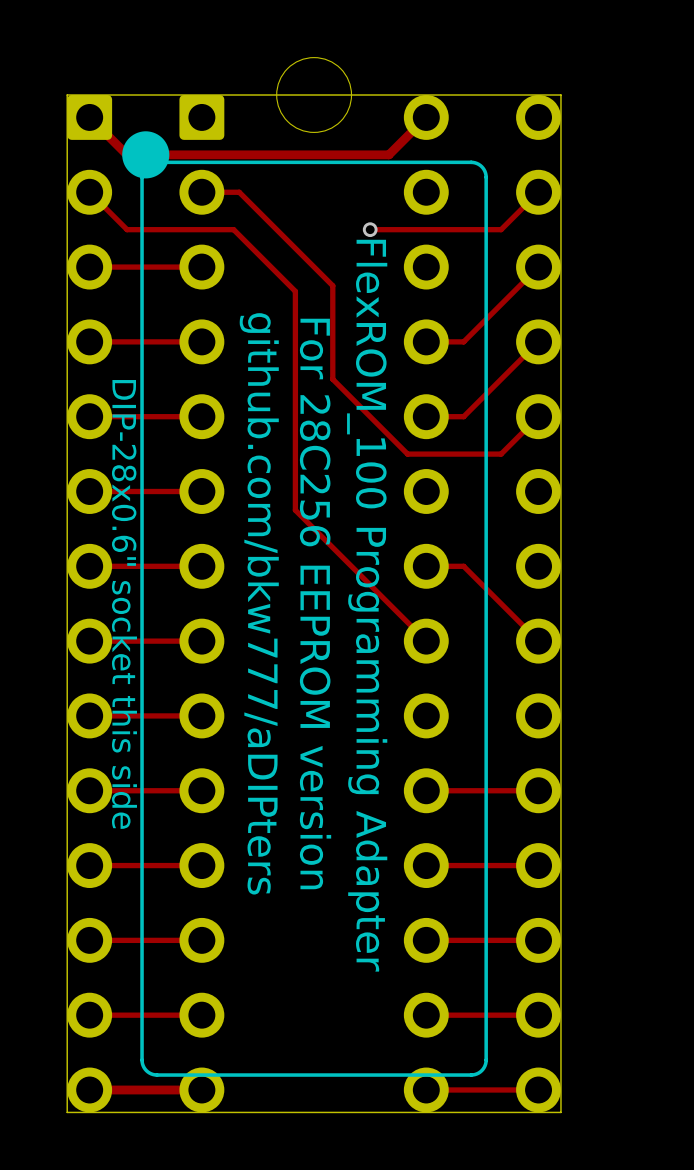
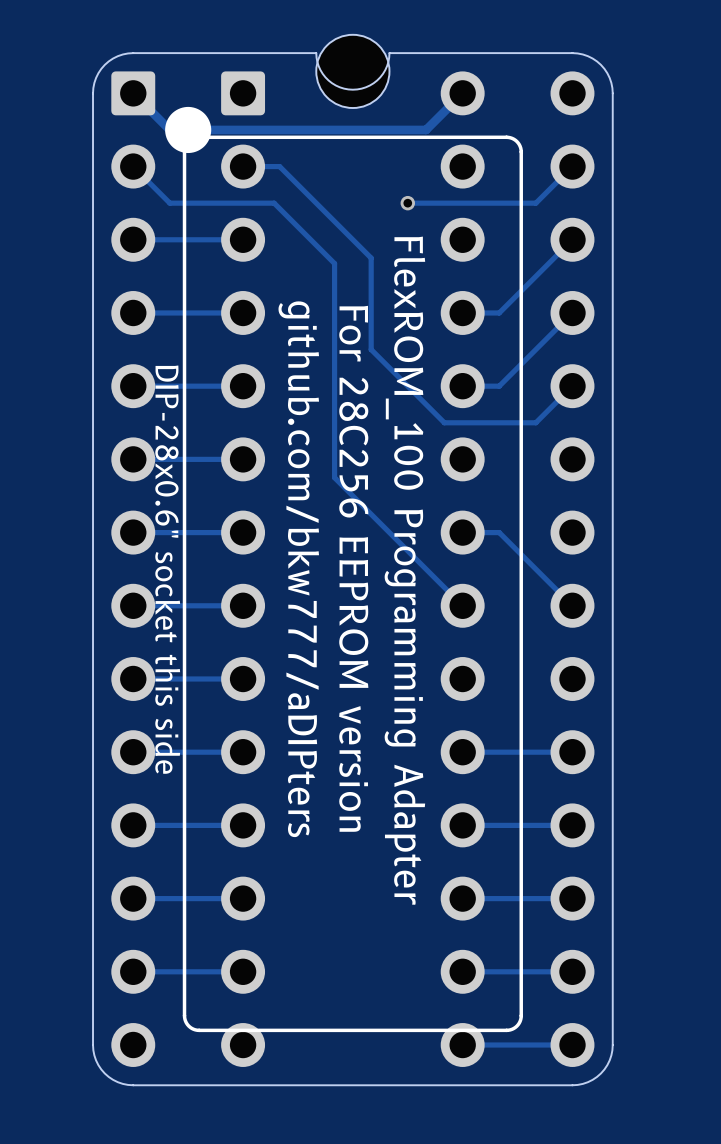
board edge: (67, 95) (67, 1112) (560, 1112) (560, 95) (67, 95) -> (133, 53) (117, 56) (104, 64) (96, 77) (93, 93) (93, 1045) (96, 1060) (108, 1076) (122, 1083) (133, 1085) (572, 1085) (587, 1082) (600, 1073) (607, 1065) (612, 1045) (612, 93) (609, 77) (597, 61) (577, 53) (389, 53) (387, 66) (380, 77) (369, 85) (352, 89) (339, 87) (328, 80) (320, 70) (316, 53) (133, 53)
track: (89, 1089) (201, 1089) -> none

